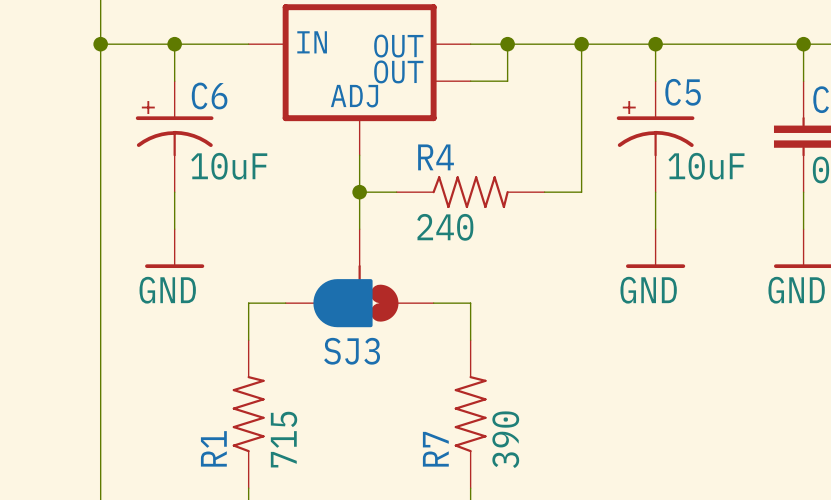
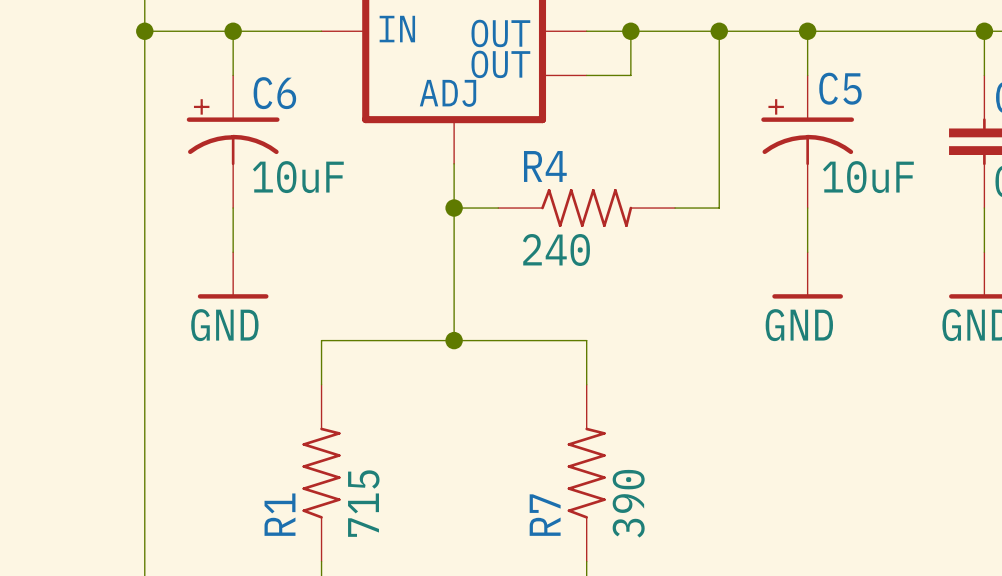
SJ3: (359, 278) -> none
junction: none -> (454, 340)

